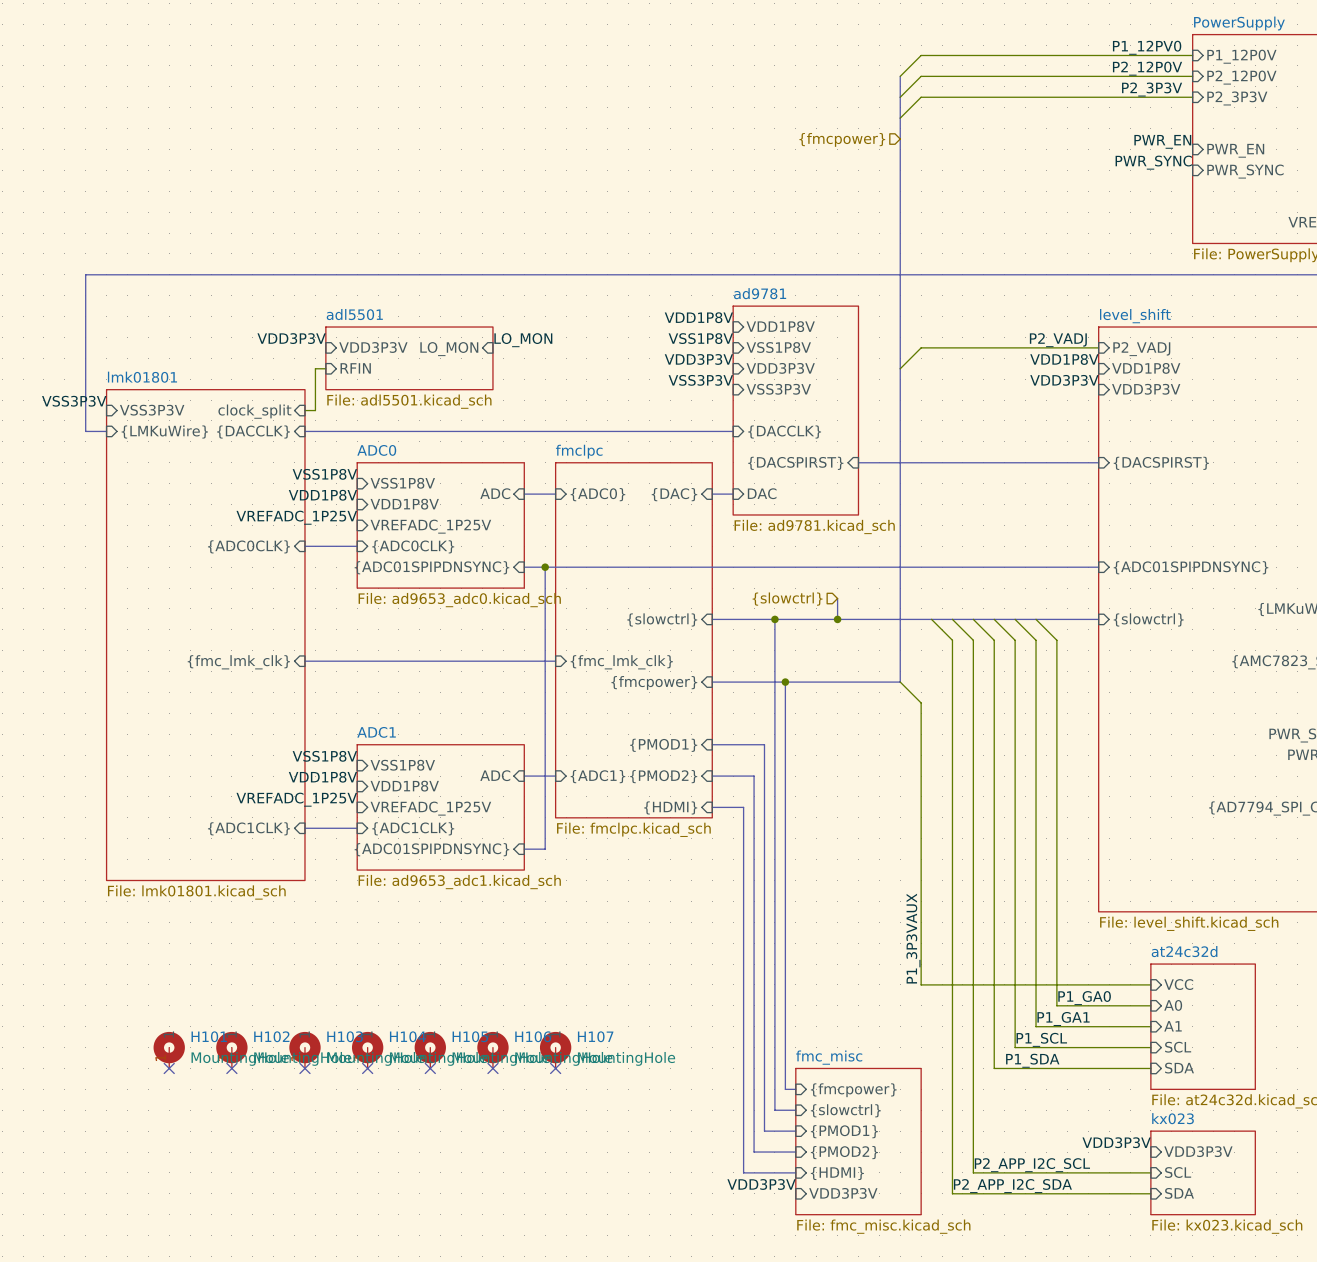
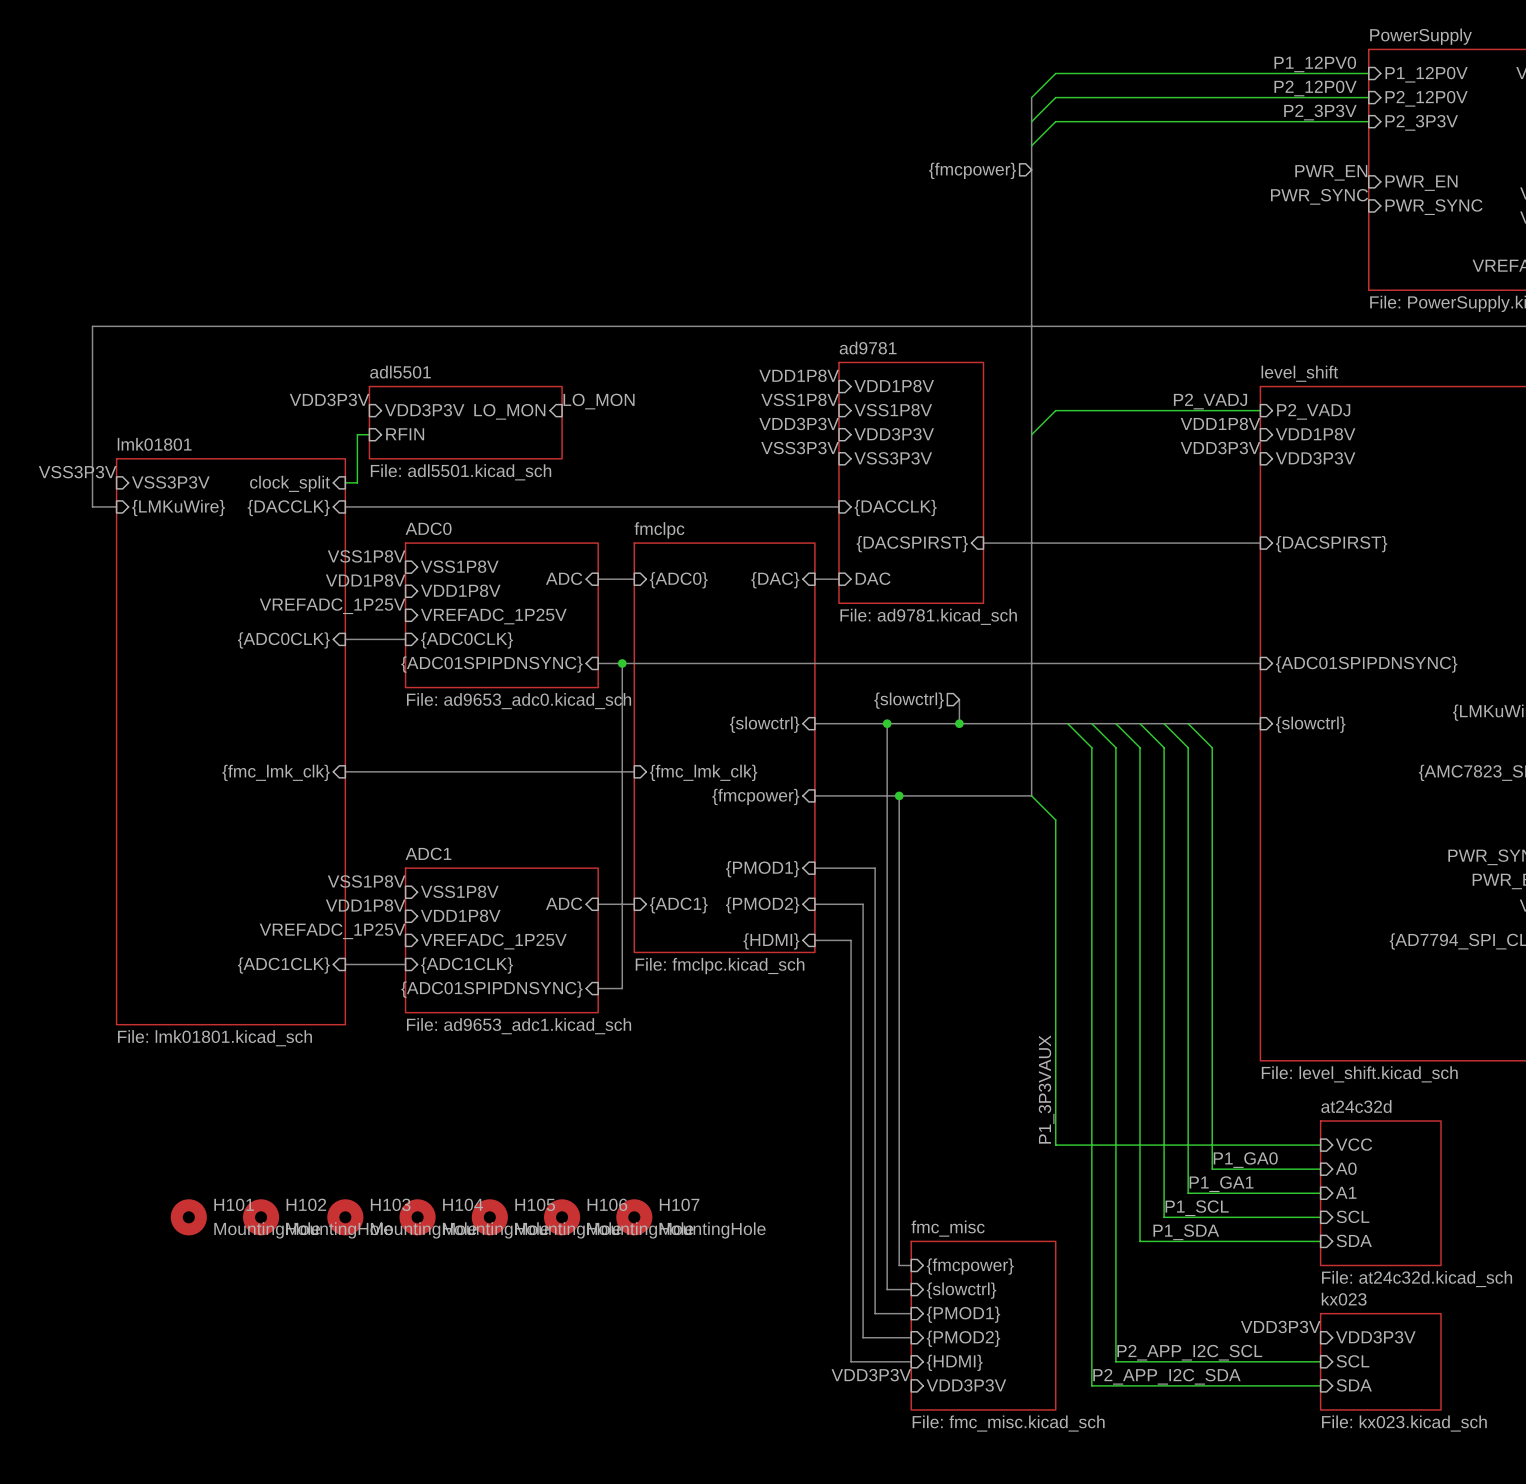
H101 symbol: [153, 1031, 185, 1069] -> [170, 1199, 207, 1236]
H102 symbol: [216, 1031, 248, 1069] -> [243, 1199, 280, 1236]
H103 symbol: [289, 1031, 321, 1069] -> [327, 1199, 364, 1236]
H104 symbol: [351, 1031, 384, 1069] -> [399, 1199, 436, 1236]
H105 symbol: [414, 1031, 446, 1069] -> [471, 1199, 508, 1236]
H106 symbol: [477, 1031, 509, 1069] -> [544, 1199, 581, 1236]
H107 symbol: [539, 1031, 572, 1069] -> [616, 1199, 653, 1236]
no-connect mark: (169, 1068) -> none
no-connect mark: (231, 1068) -> none
no-connect mark: (304, 1068) -> none
no-connect mark: (367, 1068) -> none
no-connect mark: (430, 1068) -> none
no-connect mark: (492, 1068) -> none
no-connect mark: (555, 1068) -> none

